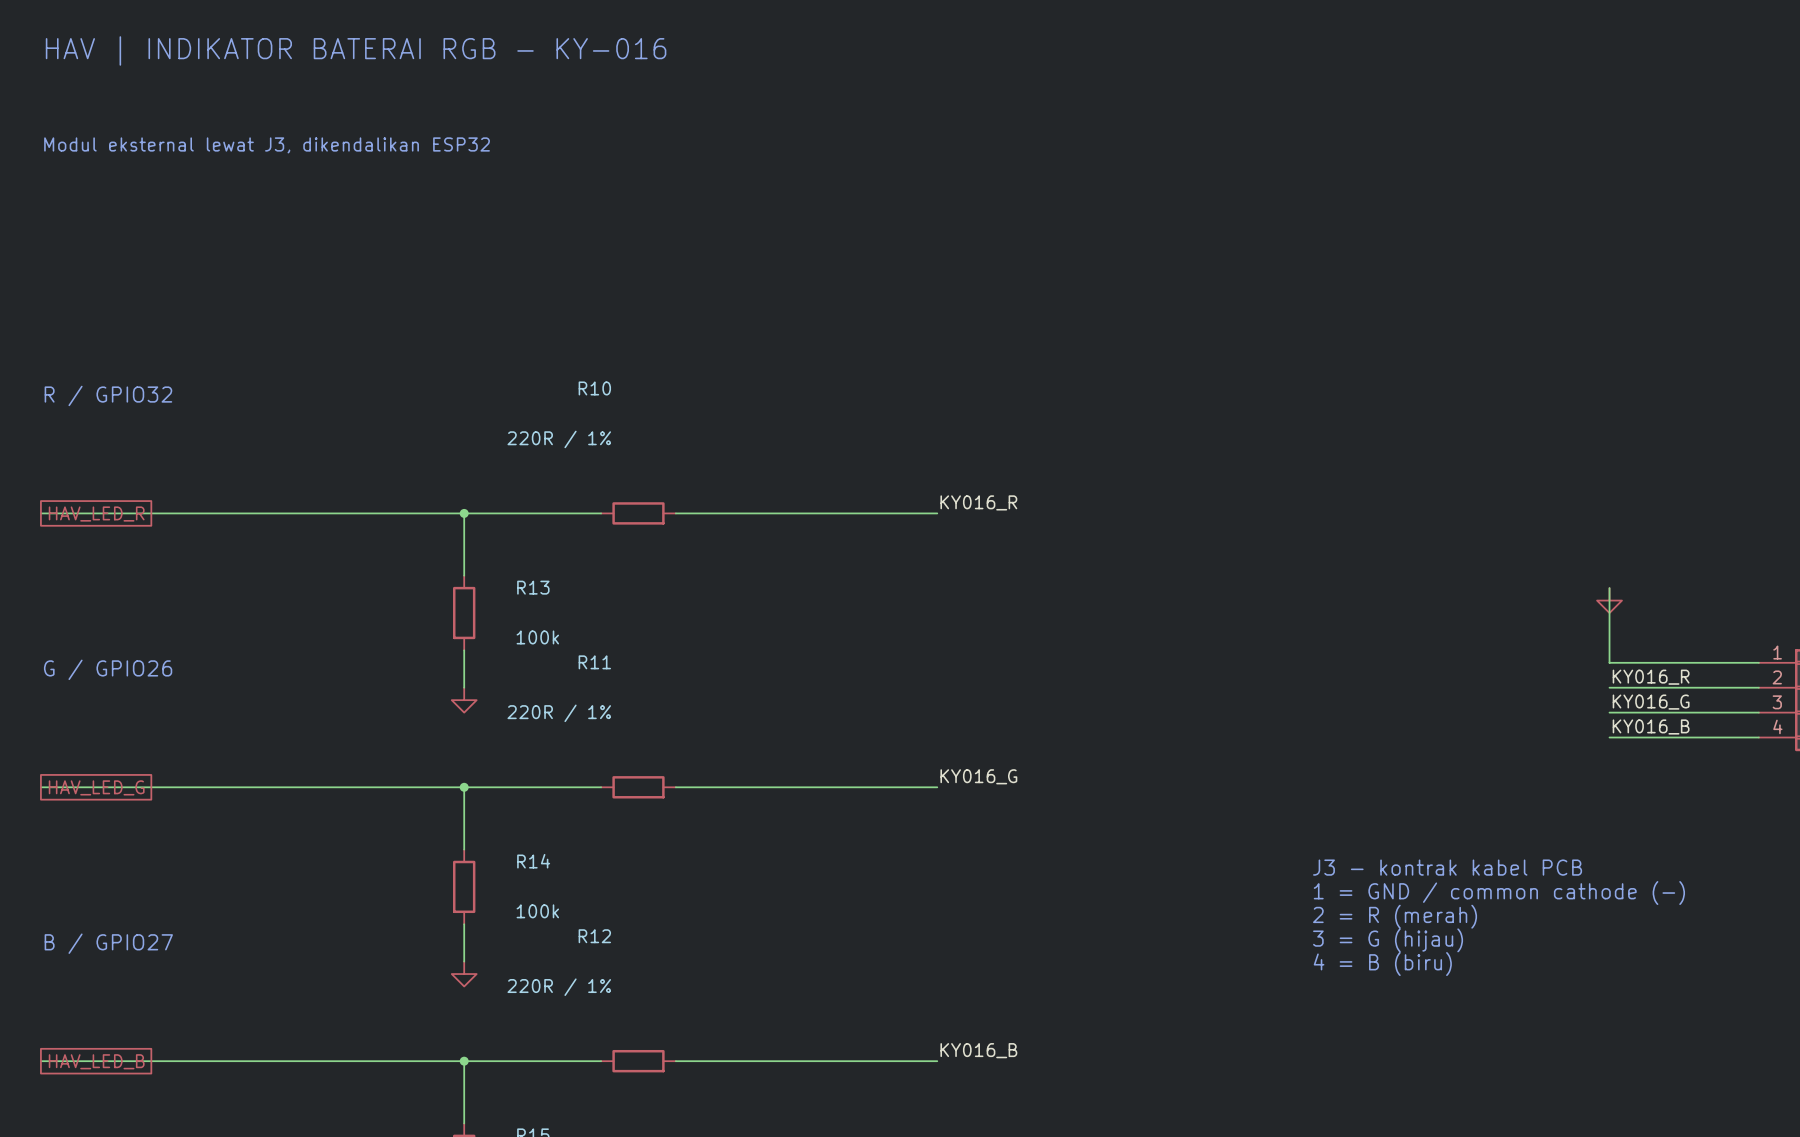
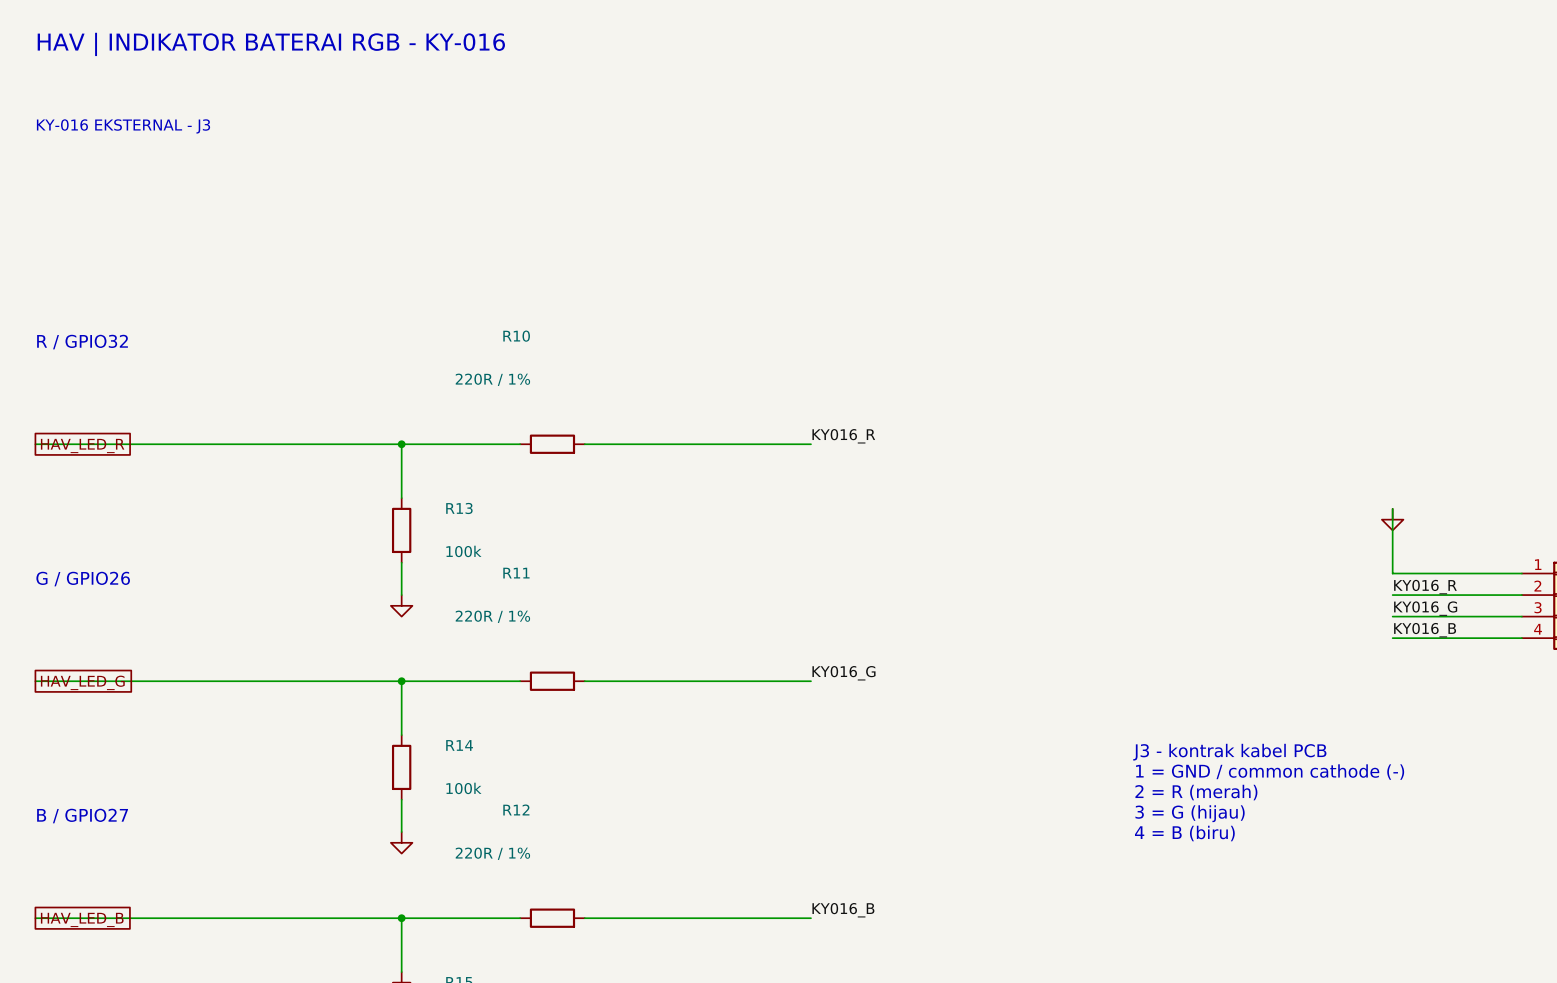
text: Modul eksternal lewat J3, dikendalikan ESP32 (267, 145) -> KY-016 EKSTERNAL - J3 (123, 126)

